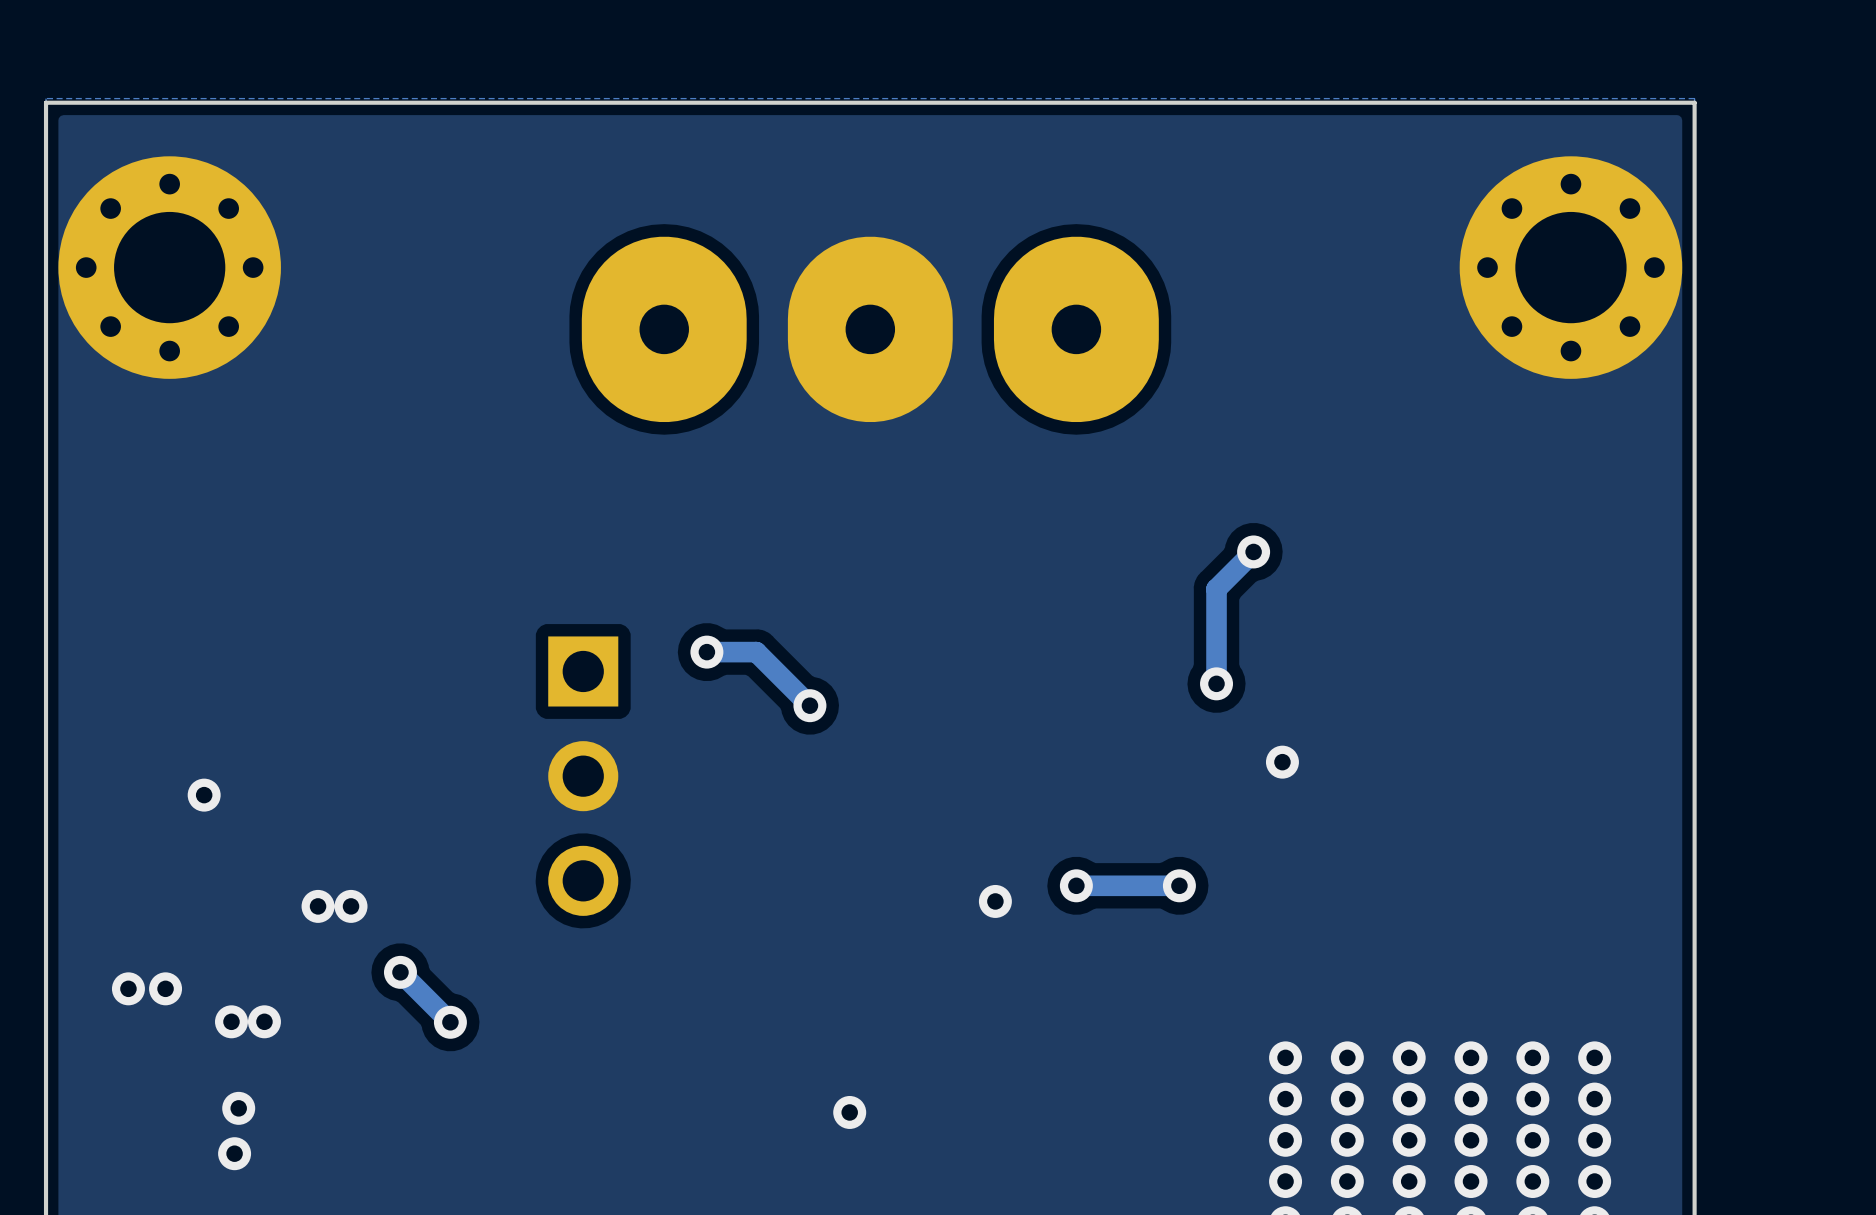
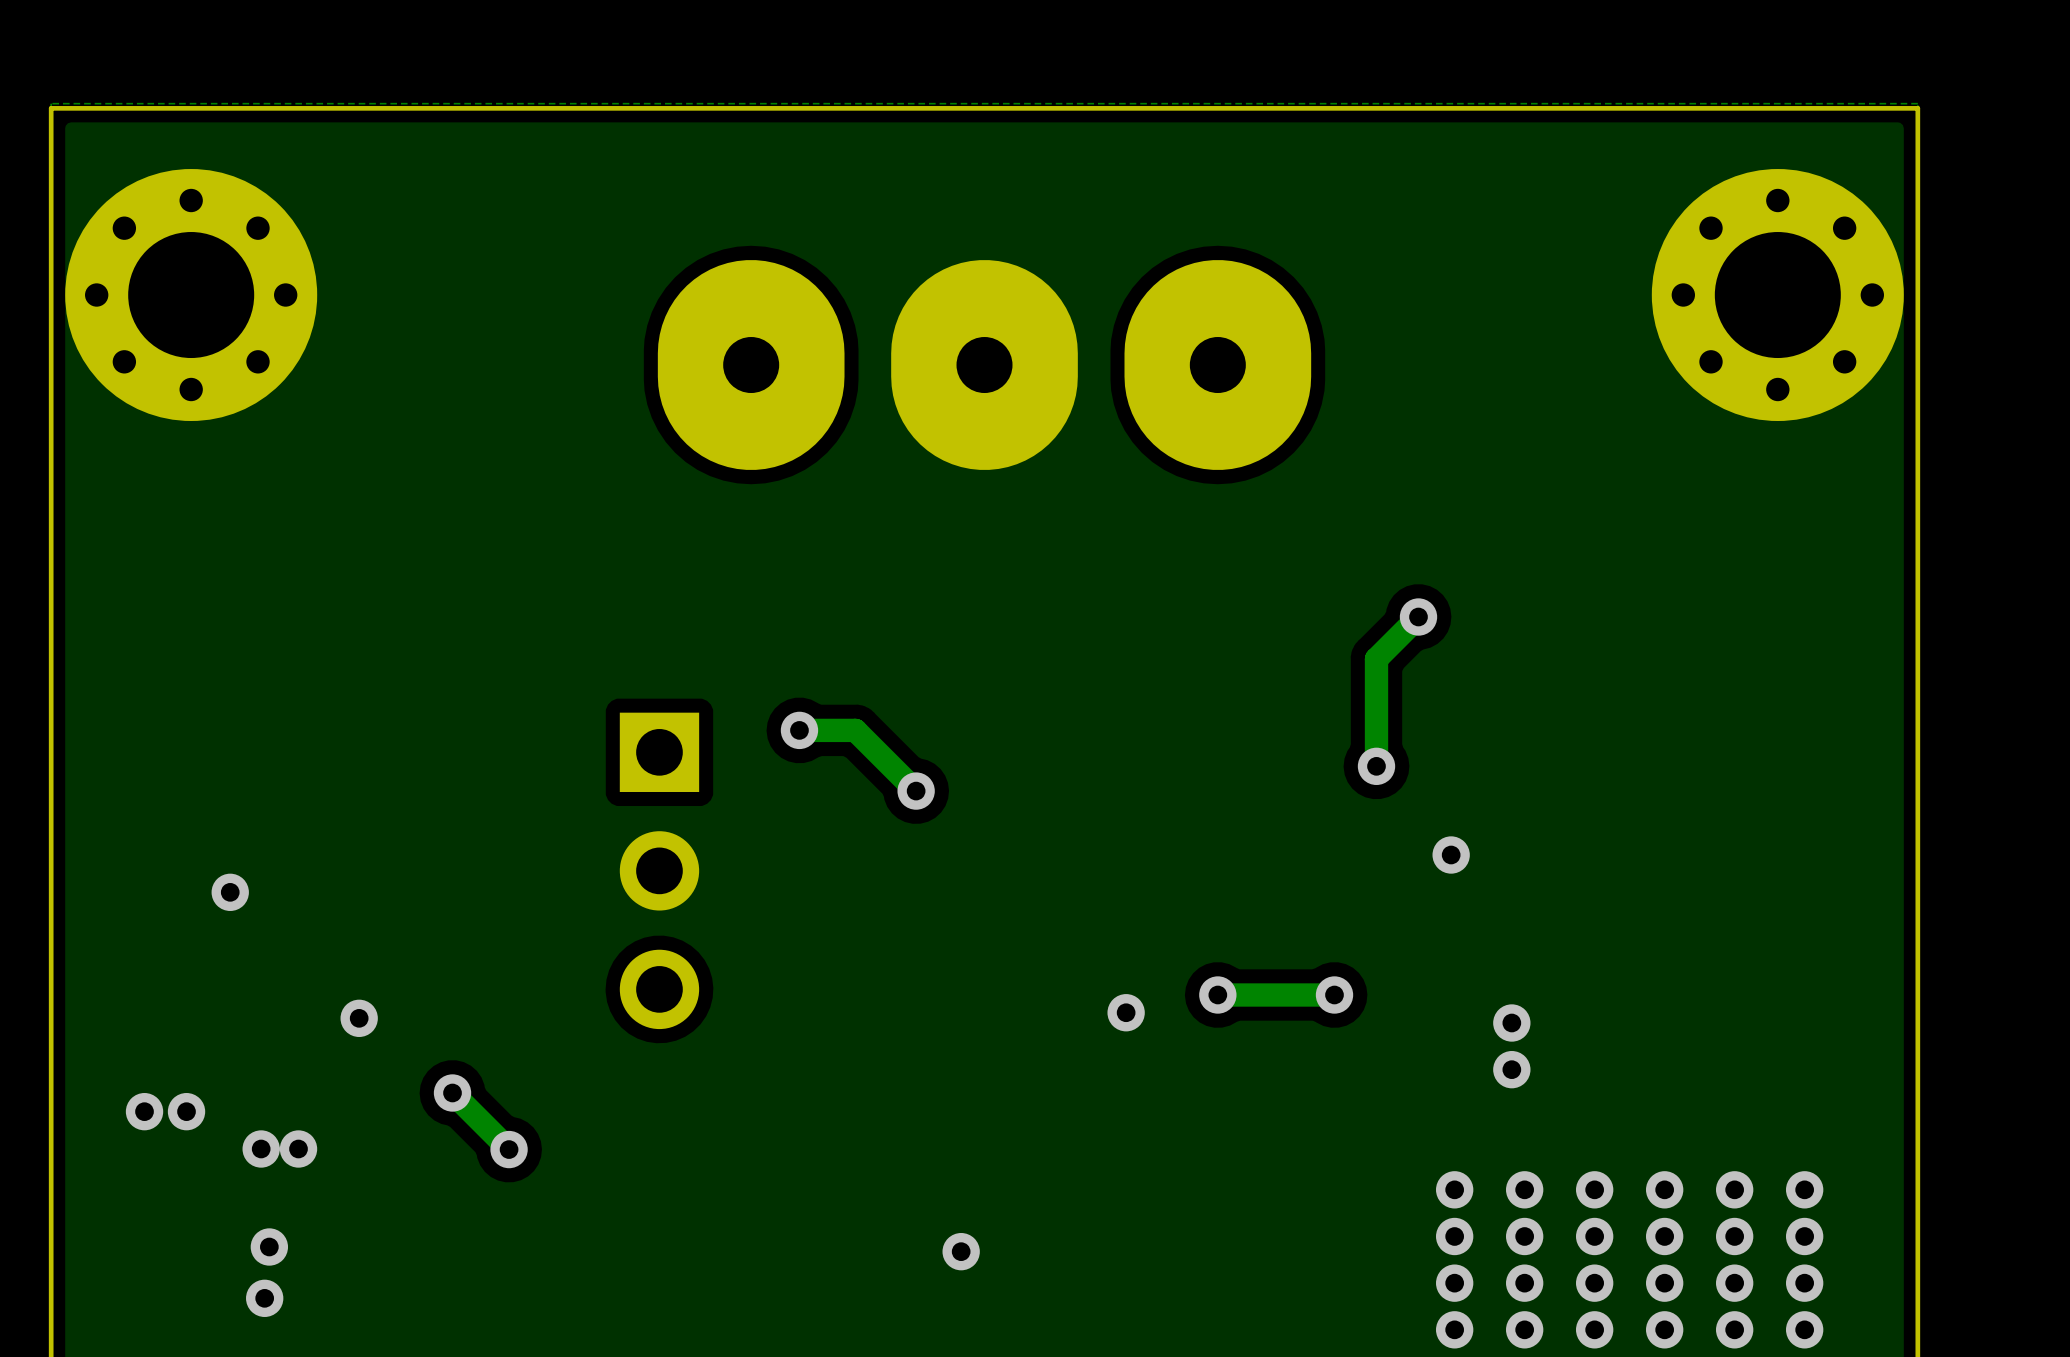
via: (351, 906) -> none
via: none -> (1511, 1023)
via: none -> (1511, 1069)

